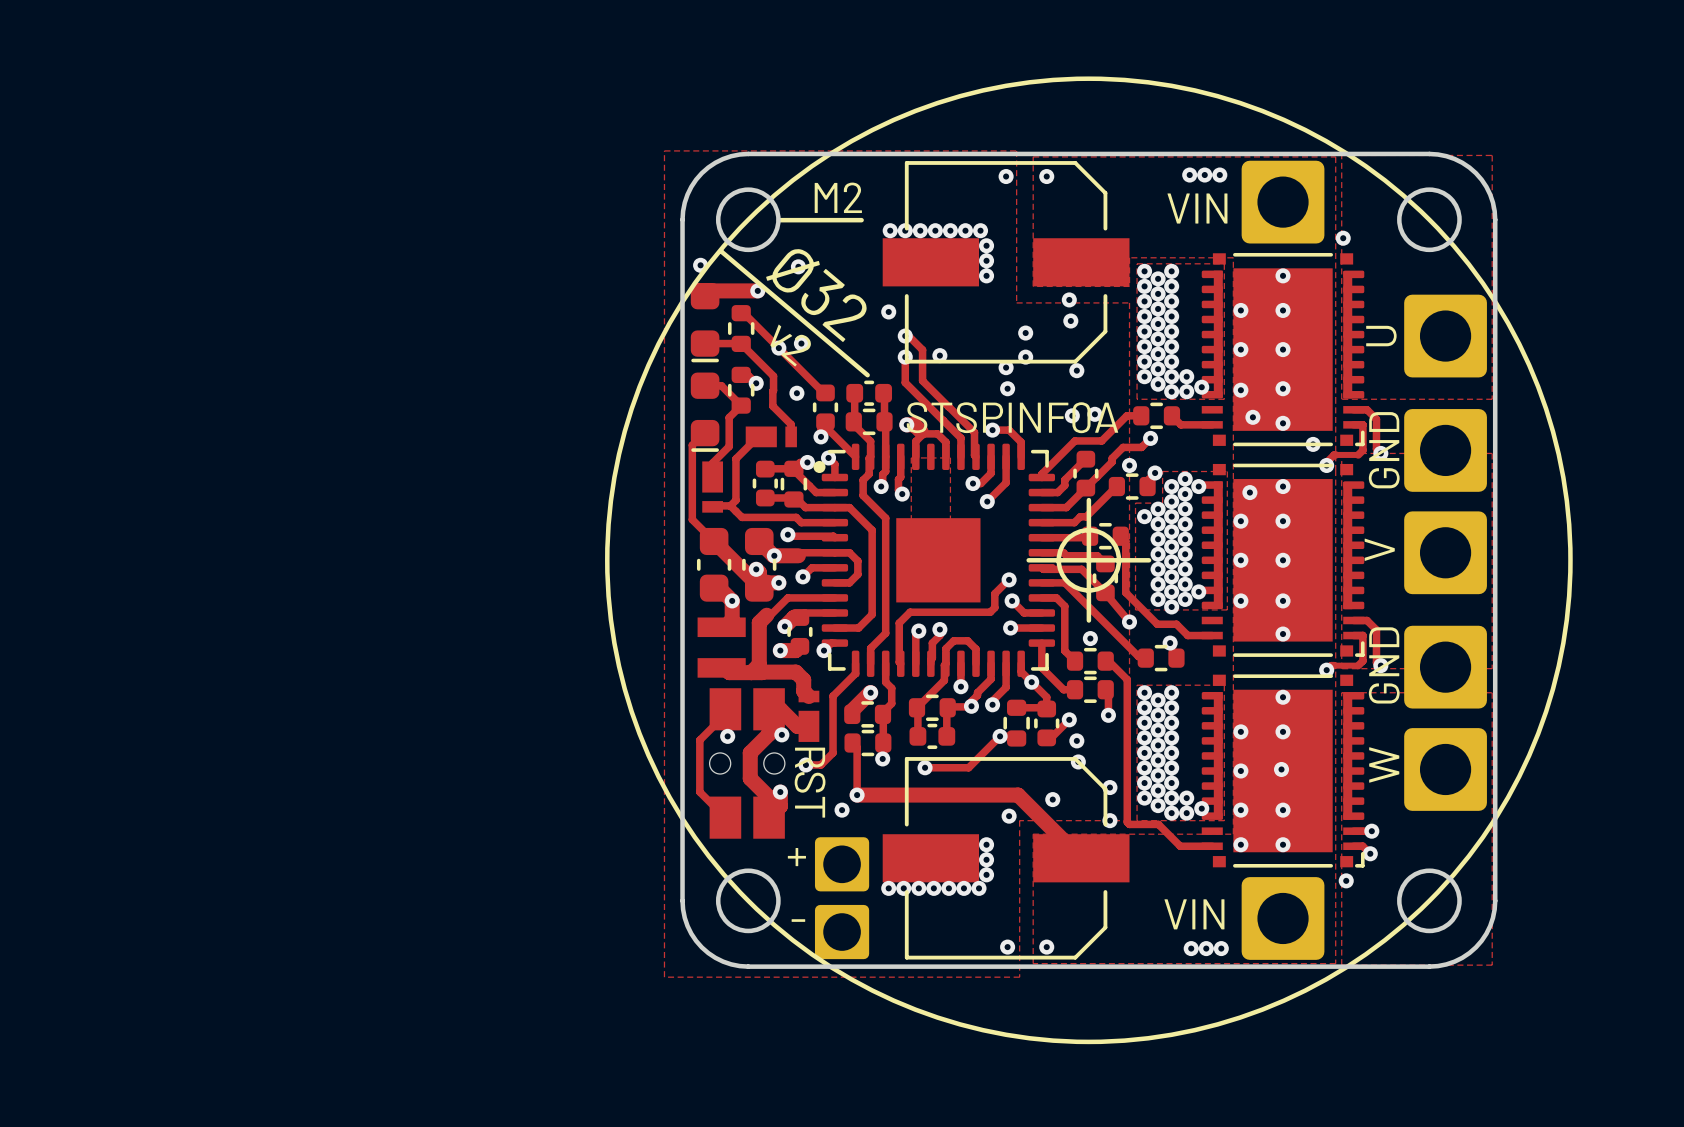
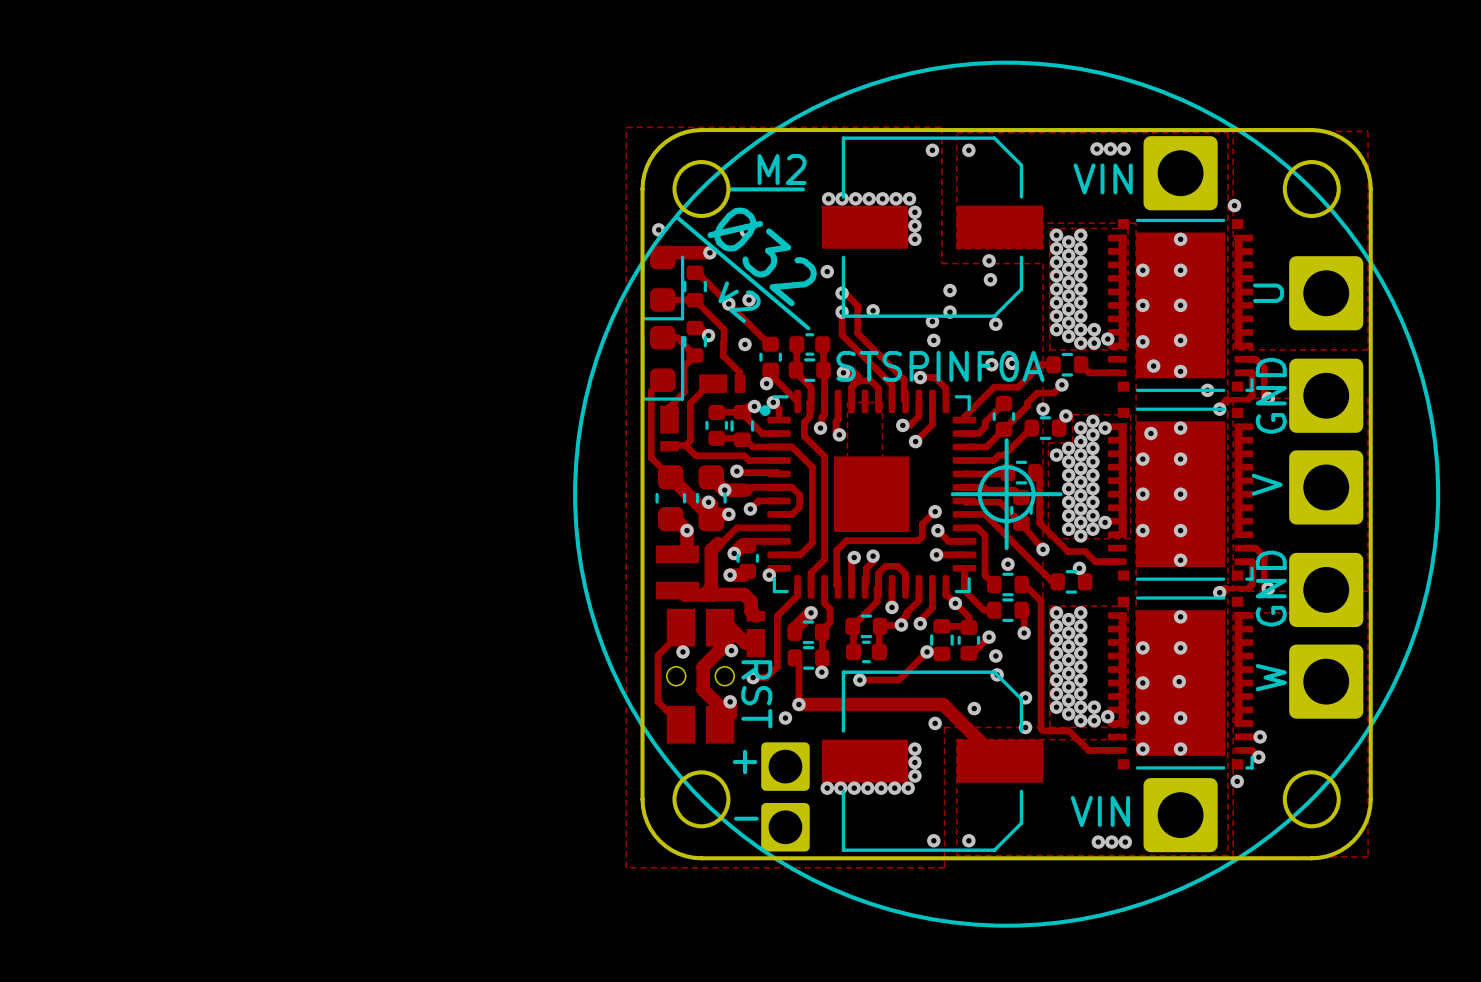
part footprint: [690, 283, 720, 363] -> [641, 245, 685, 321]
part footprint: [690, 372, 720, 452] -> [641, 325, 685, 401]
STSPINF0A name: STSPINF0A (1012, 417) -> none
text: none -> STSPINF0A (940, 366)

